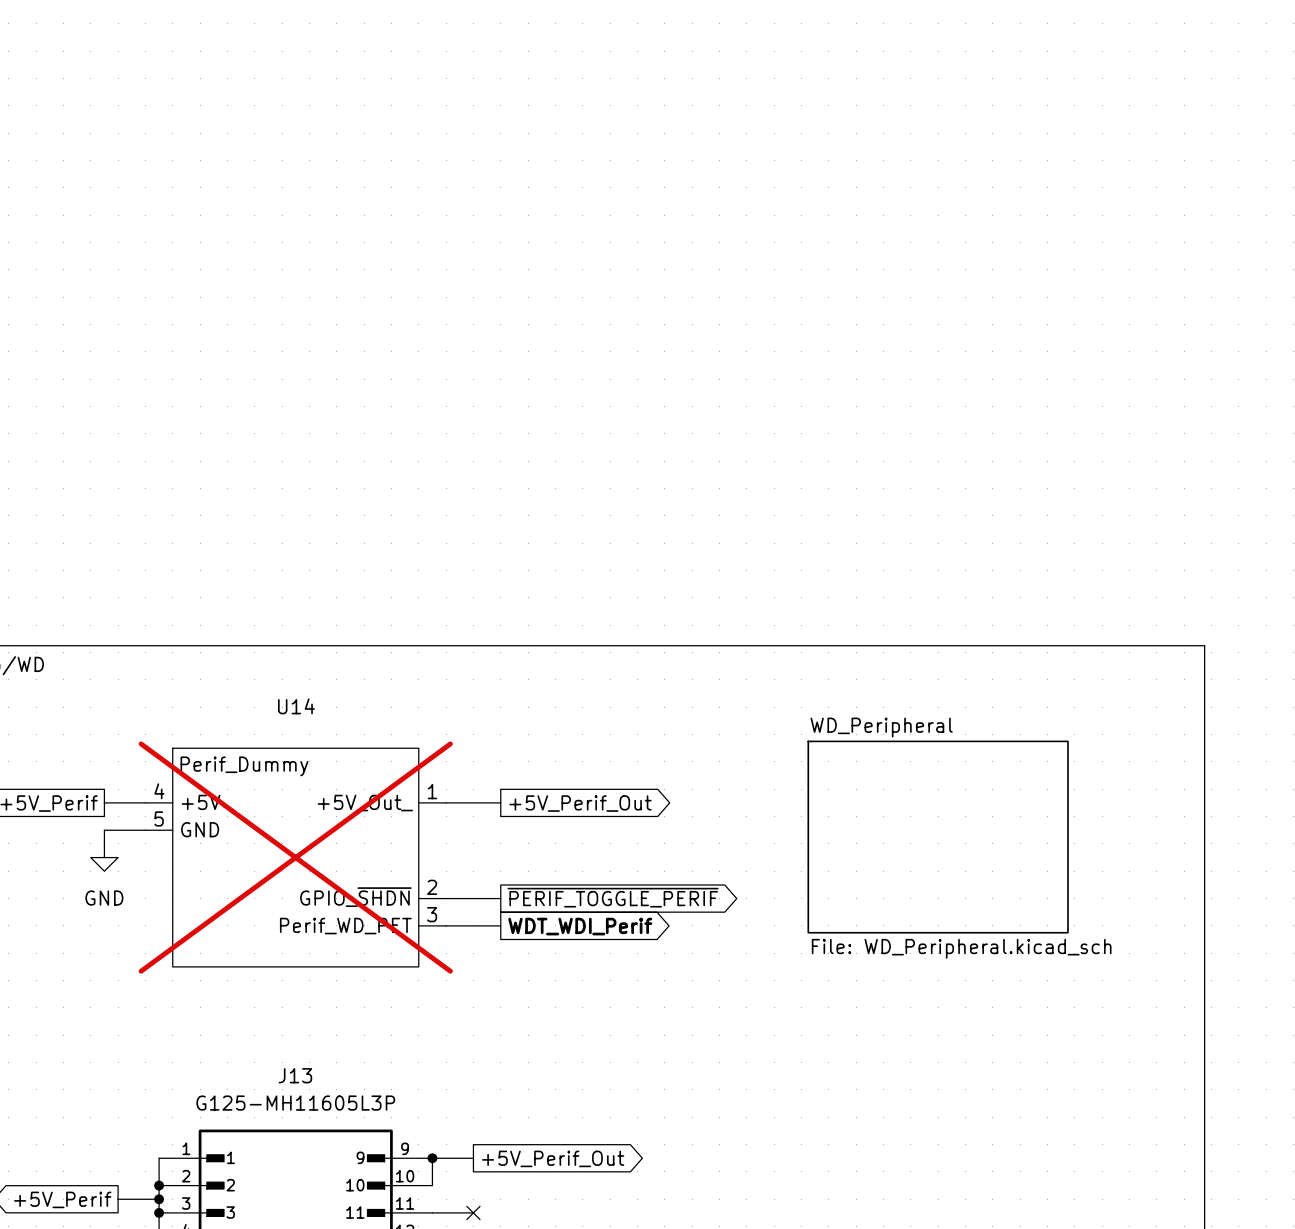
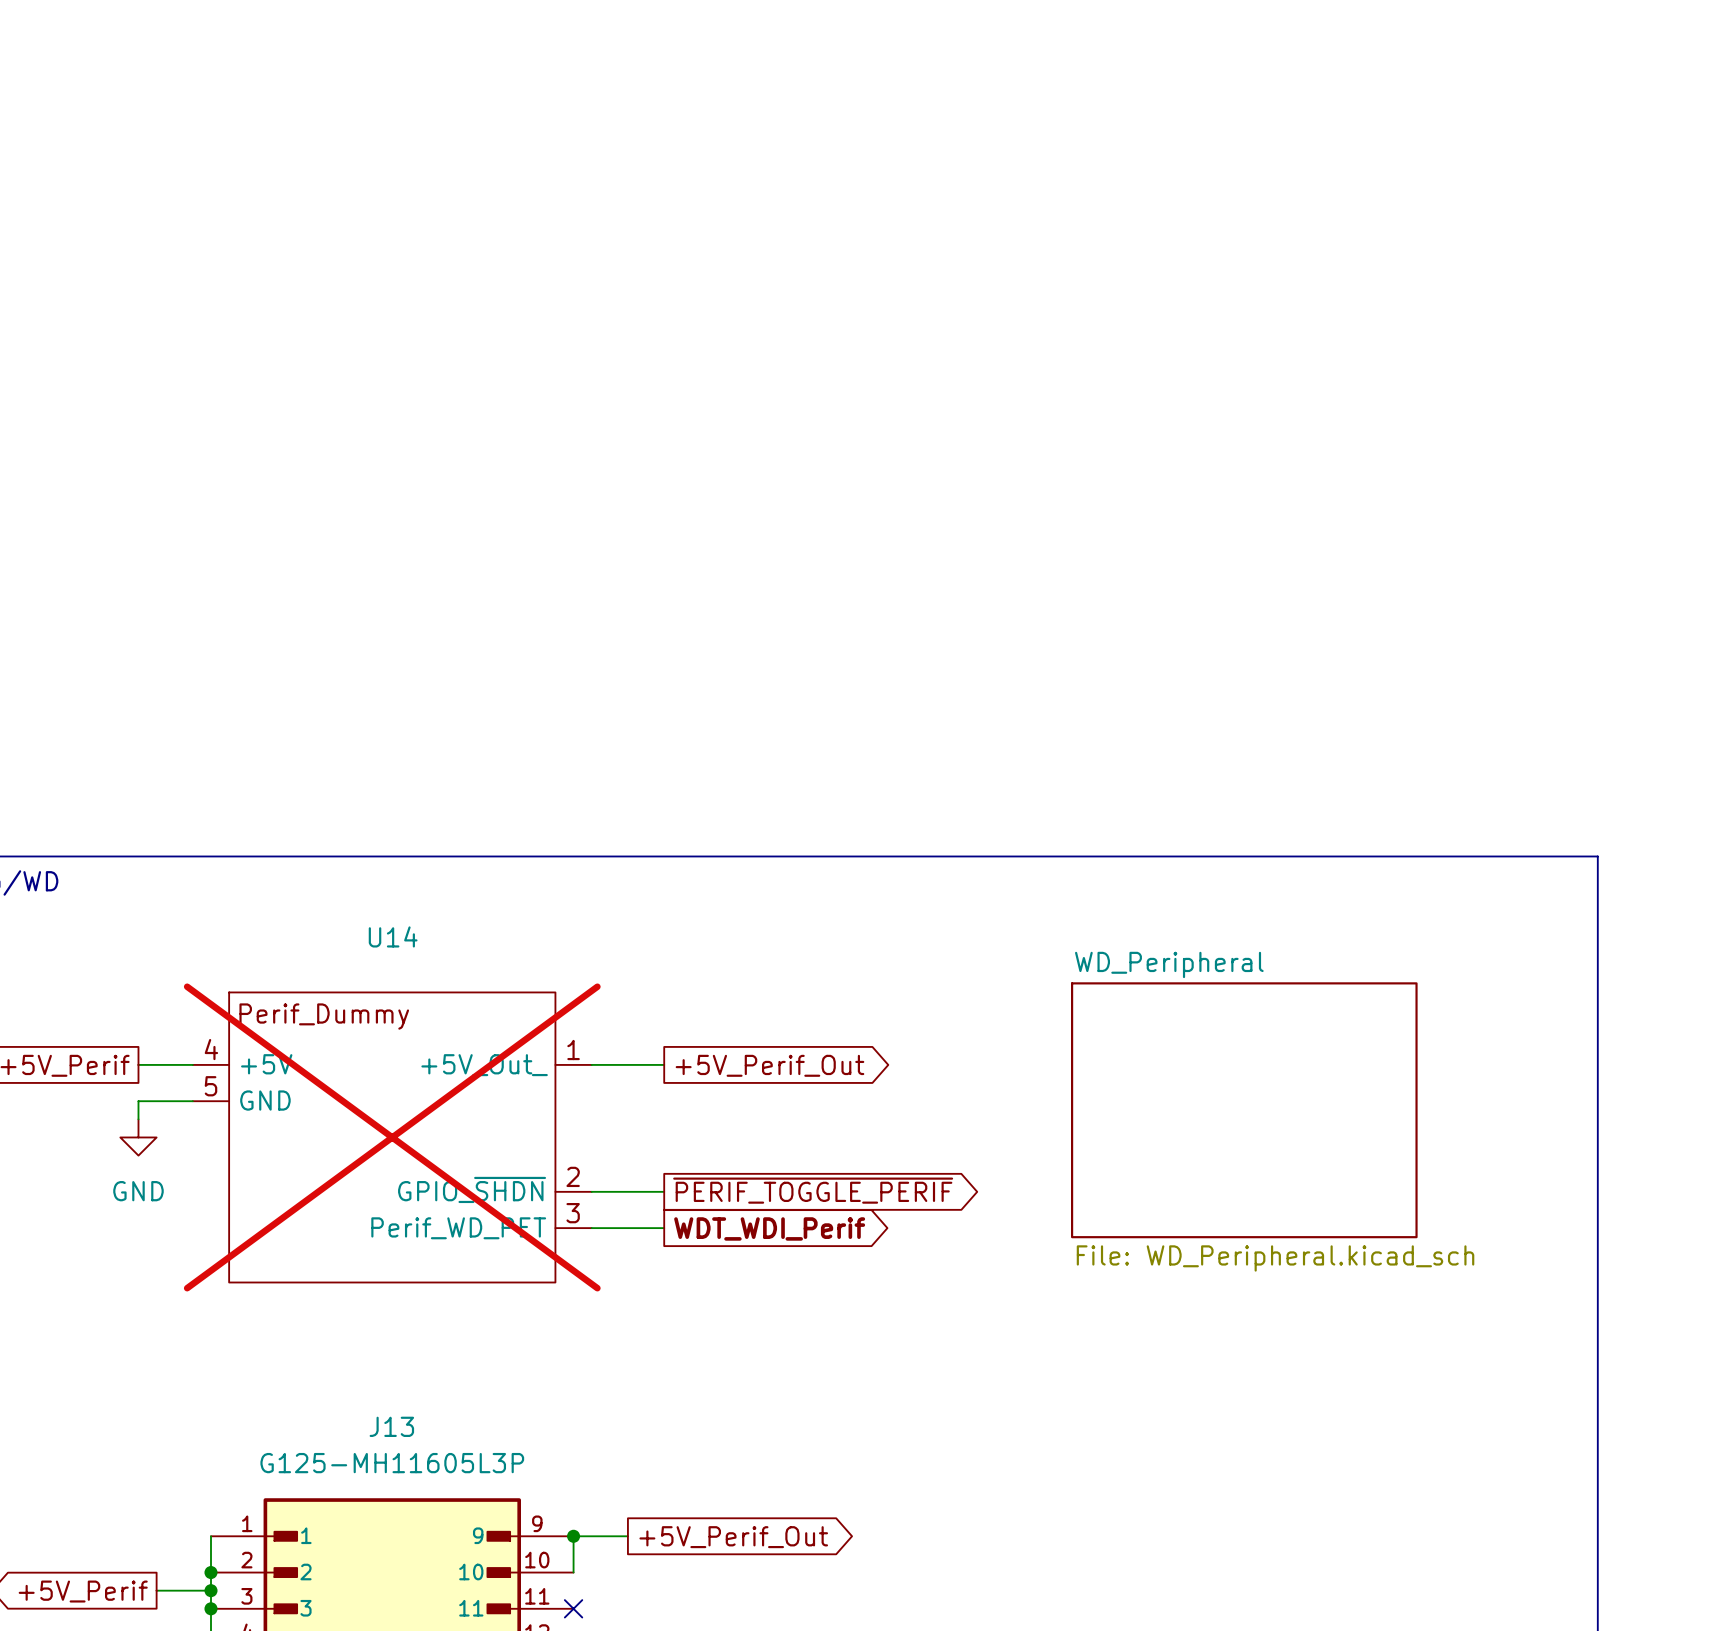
wire: (432, 1212) (473, 1212) -> none
no-connect mark: none -> (573, 1608)
no-connect mark: (473, 1212) -> none

